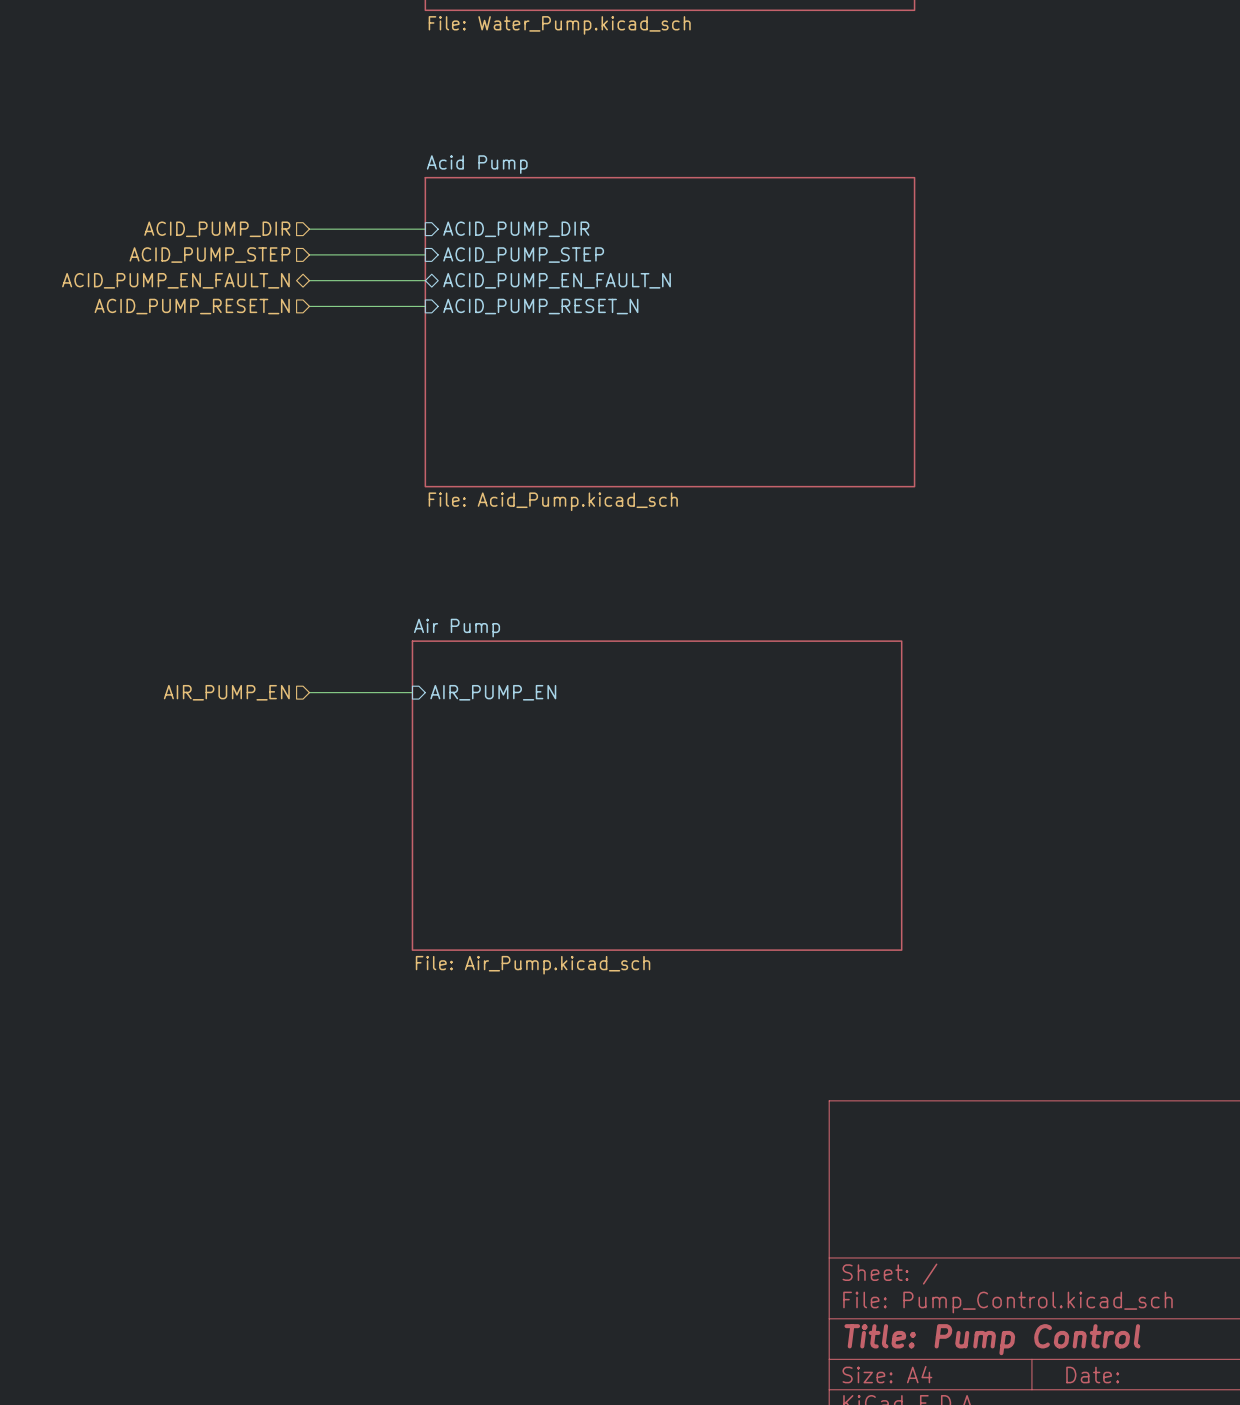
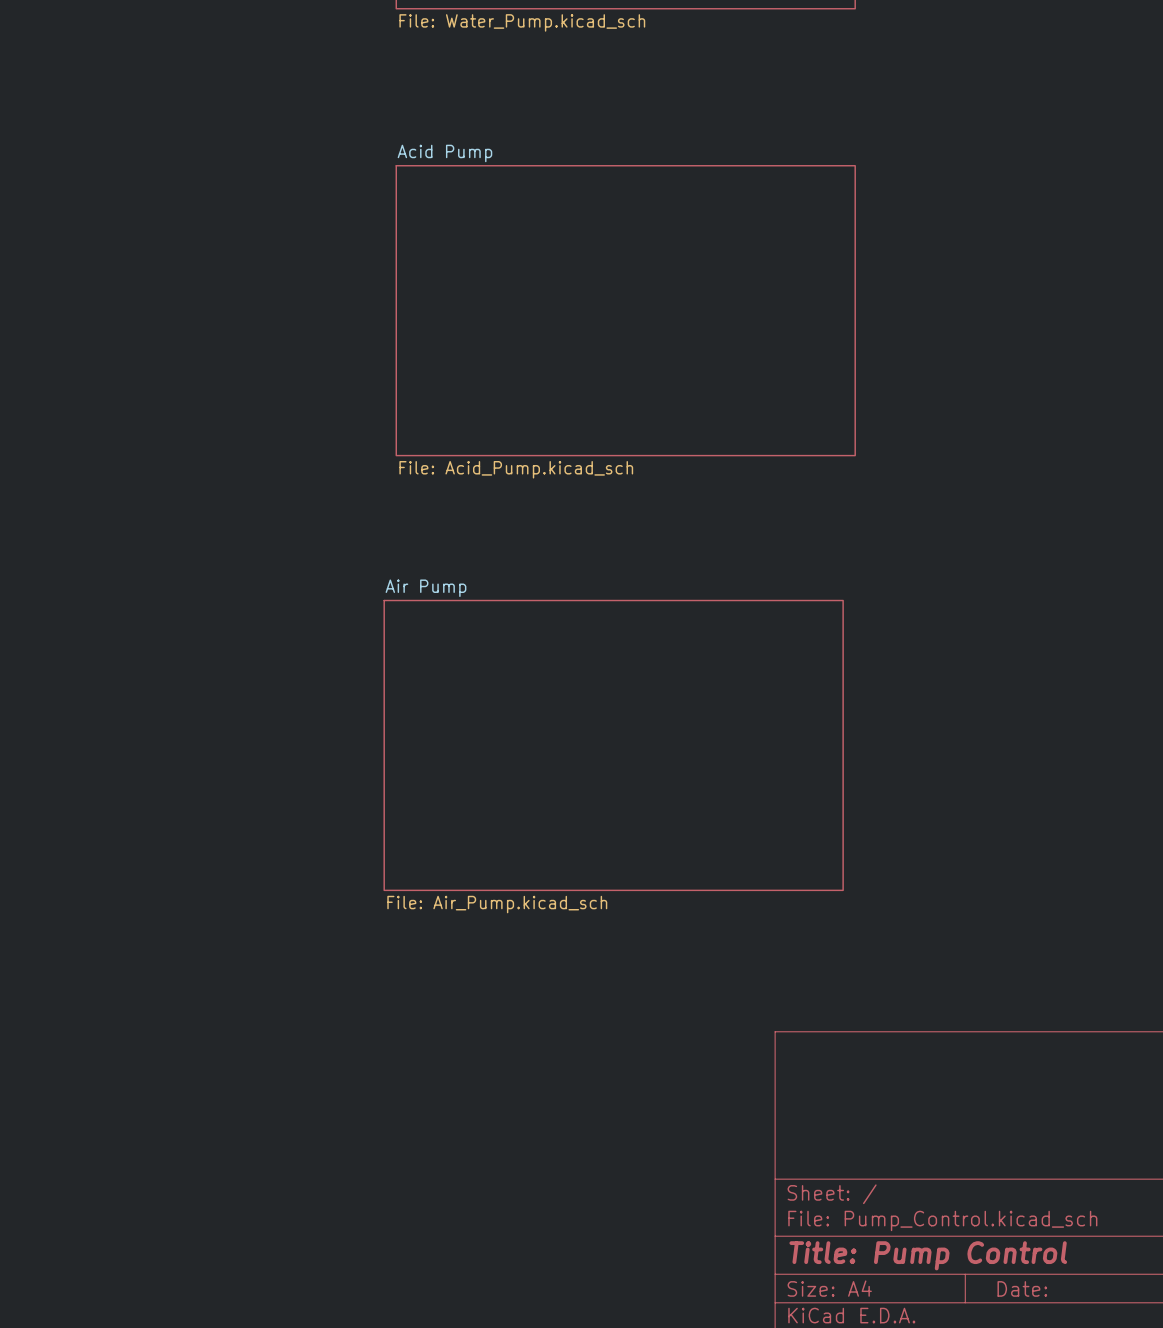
hierarchical label: ACID_PUMP_DIR (217, 229) -> none
wire: (309, 229) (425, 229) -> none
sheet pin: ACID_PUMP_DIR (516, 229) -> none
wire: (309, 254) (425, 254) -> none
hierarchical label: ACID_PUMP_STEP (209, 255) -> none
sheet pin: ACID_PUMP_STEP (523, 255) -> none
hierarchical label: ACID_PUMP_EN_FAULT_N (175, 280) -> none
wire: (309, 280) (425, 280) -> none
sheet pin: ACID_PUMP_EN_FAULT_N (557, 280) -> none
hierarchical label: ACID_PUMP_RESET_N (192, 306) -> none
wire: (309, 306) (425, 306) -> none
sheet pin: ACID_PUMP_RESET_N (540, 306) -> none
hierarchical label: AIR_PUMP_EN (226, 692) -> none
wire: (309, 692) (412, 692) -> none
sheet pin: AIR_PUMP_EN (493, 692) -> none

